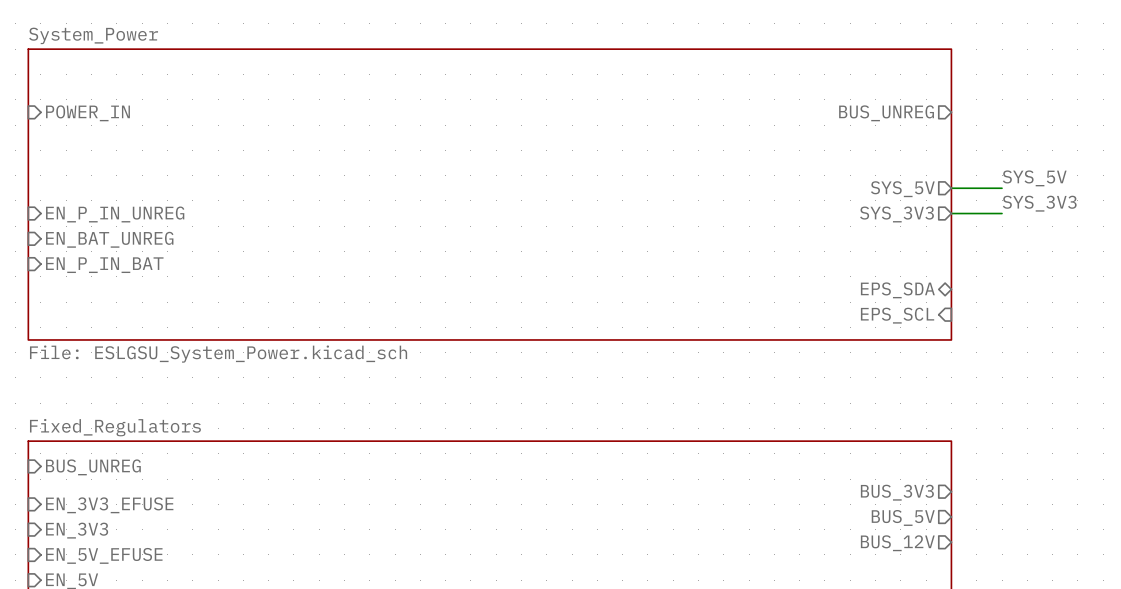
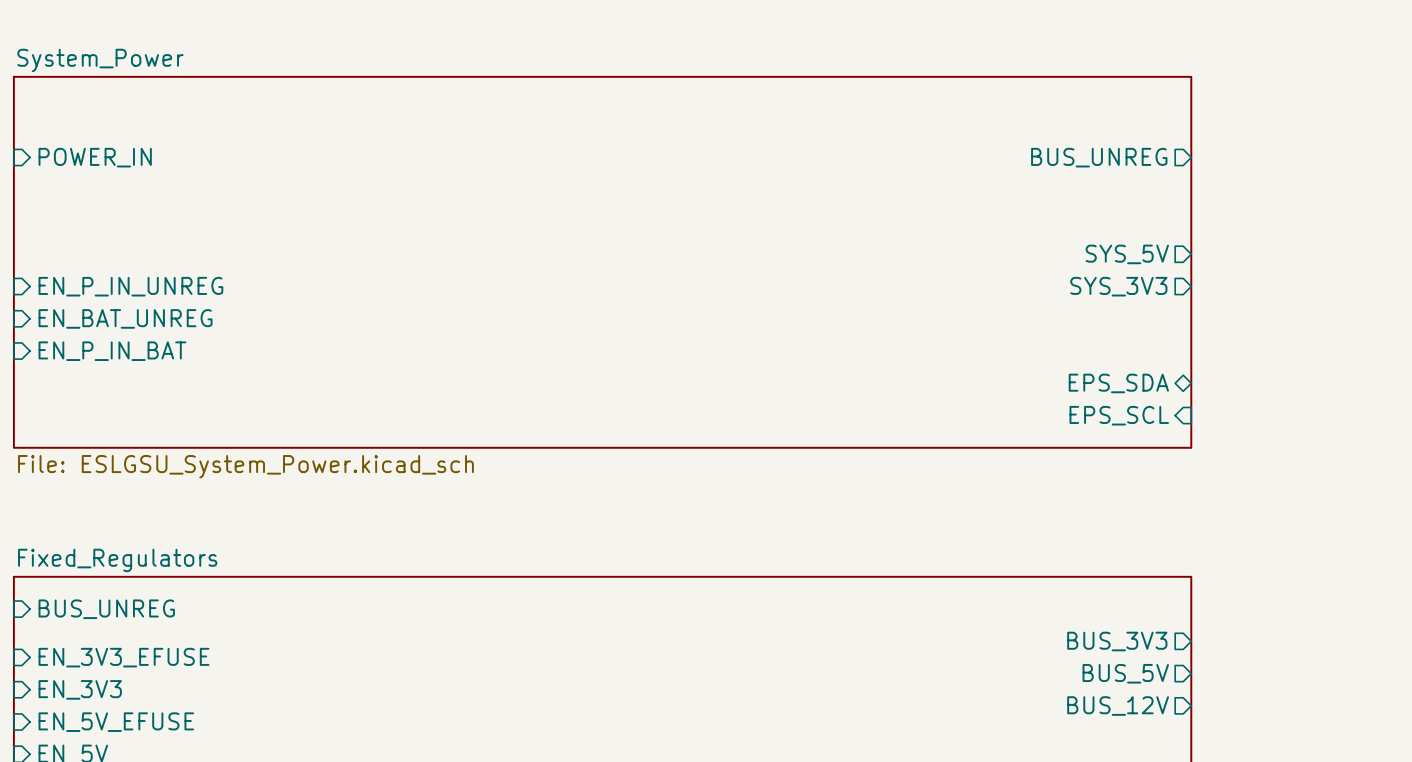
label: SYS_5V (1034, 178) -> none
wire: (951, 188) (1002, 188) -> none
label: SYS_3V3 (1039, 203) -> none
wire: (951, 213) (1002, 213) -> none

